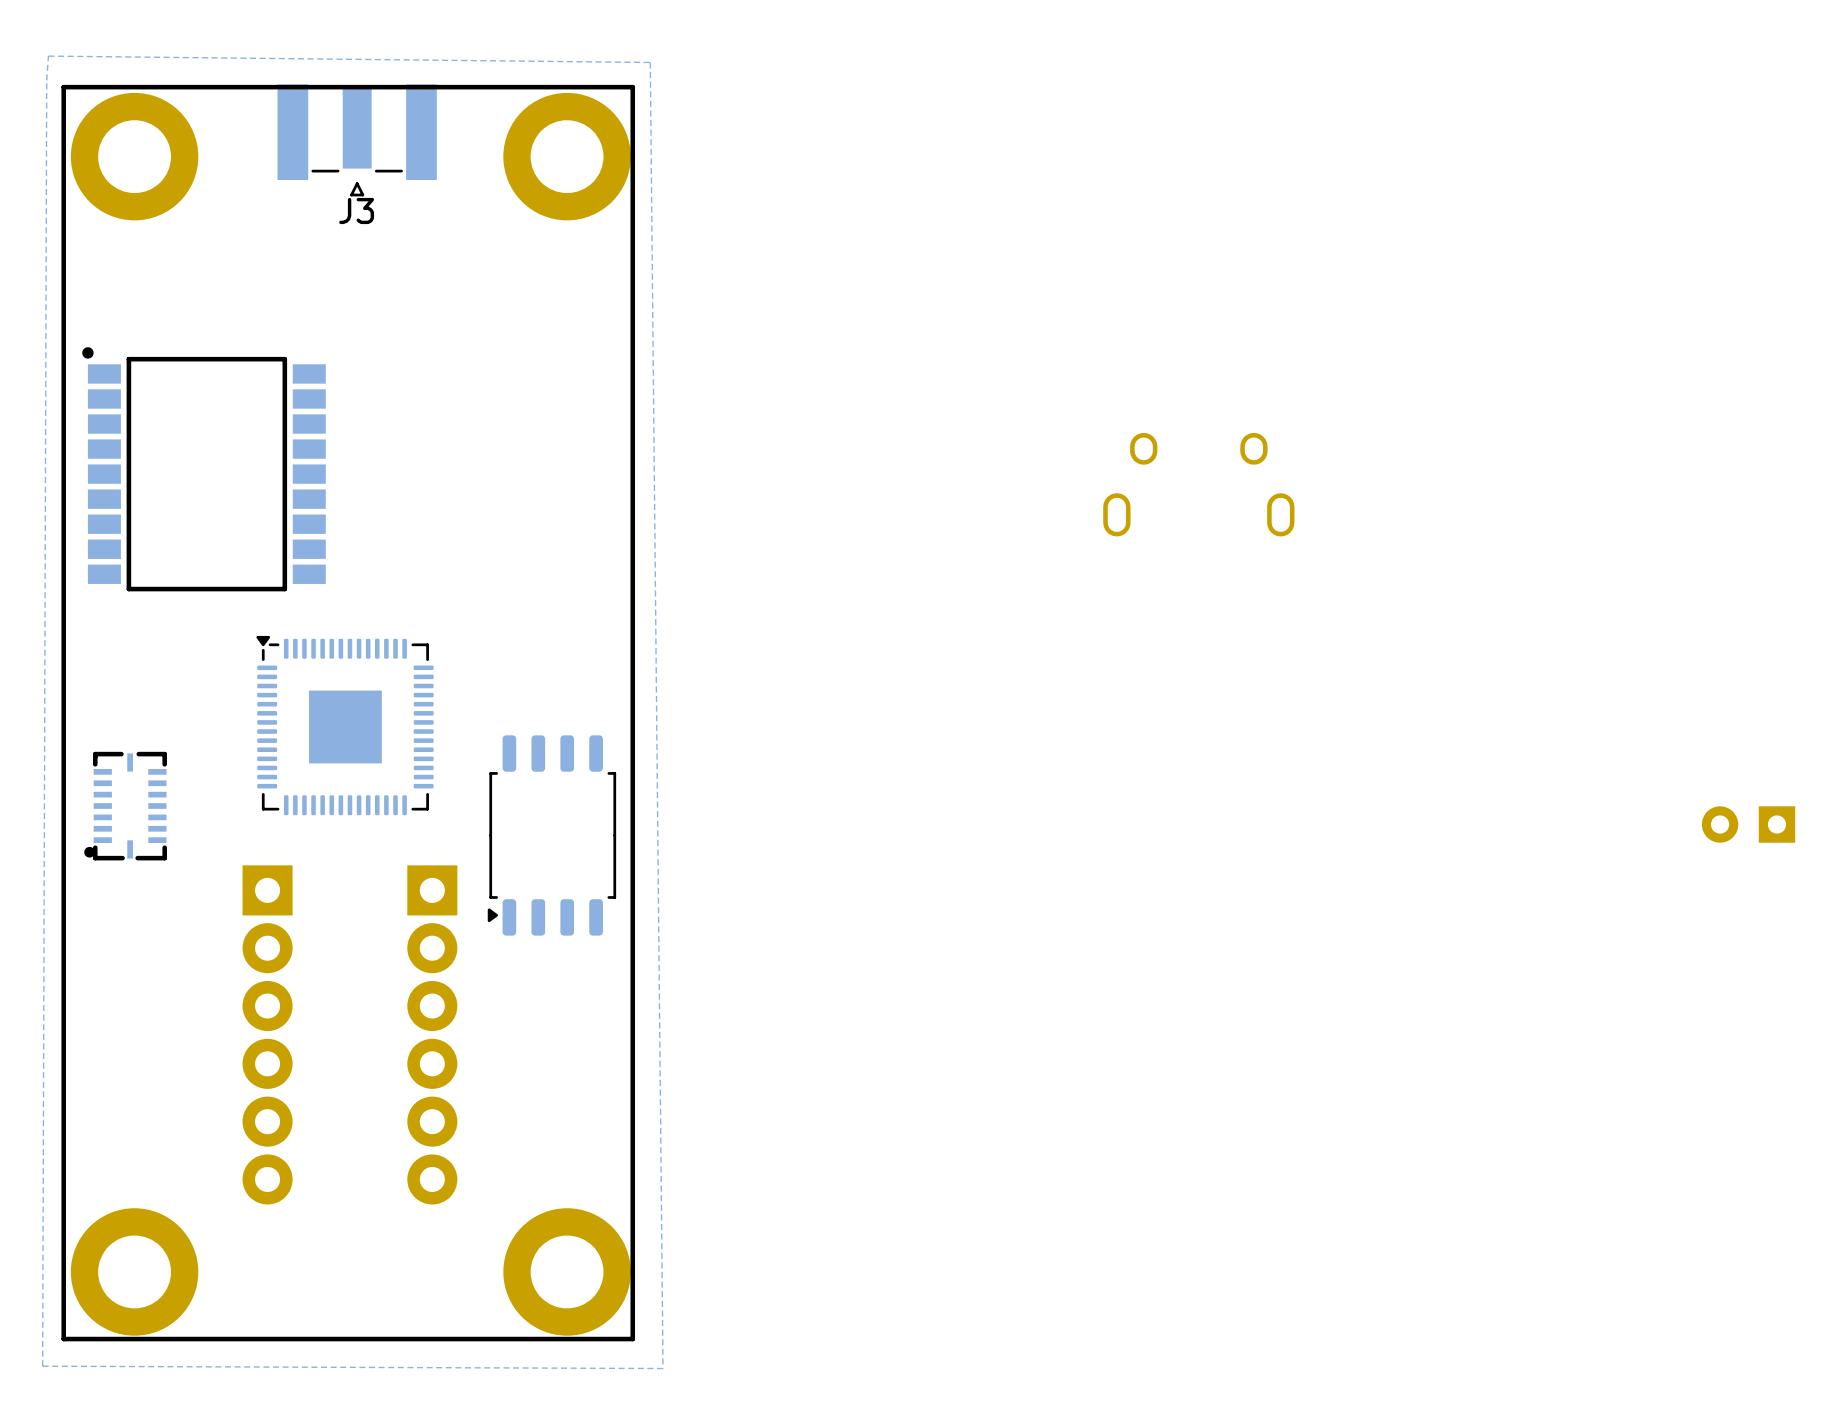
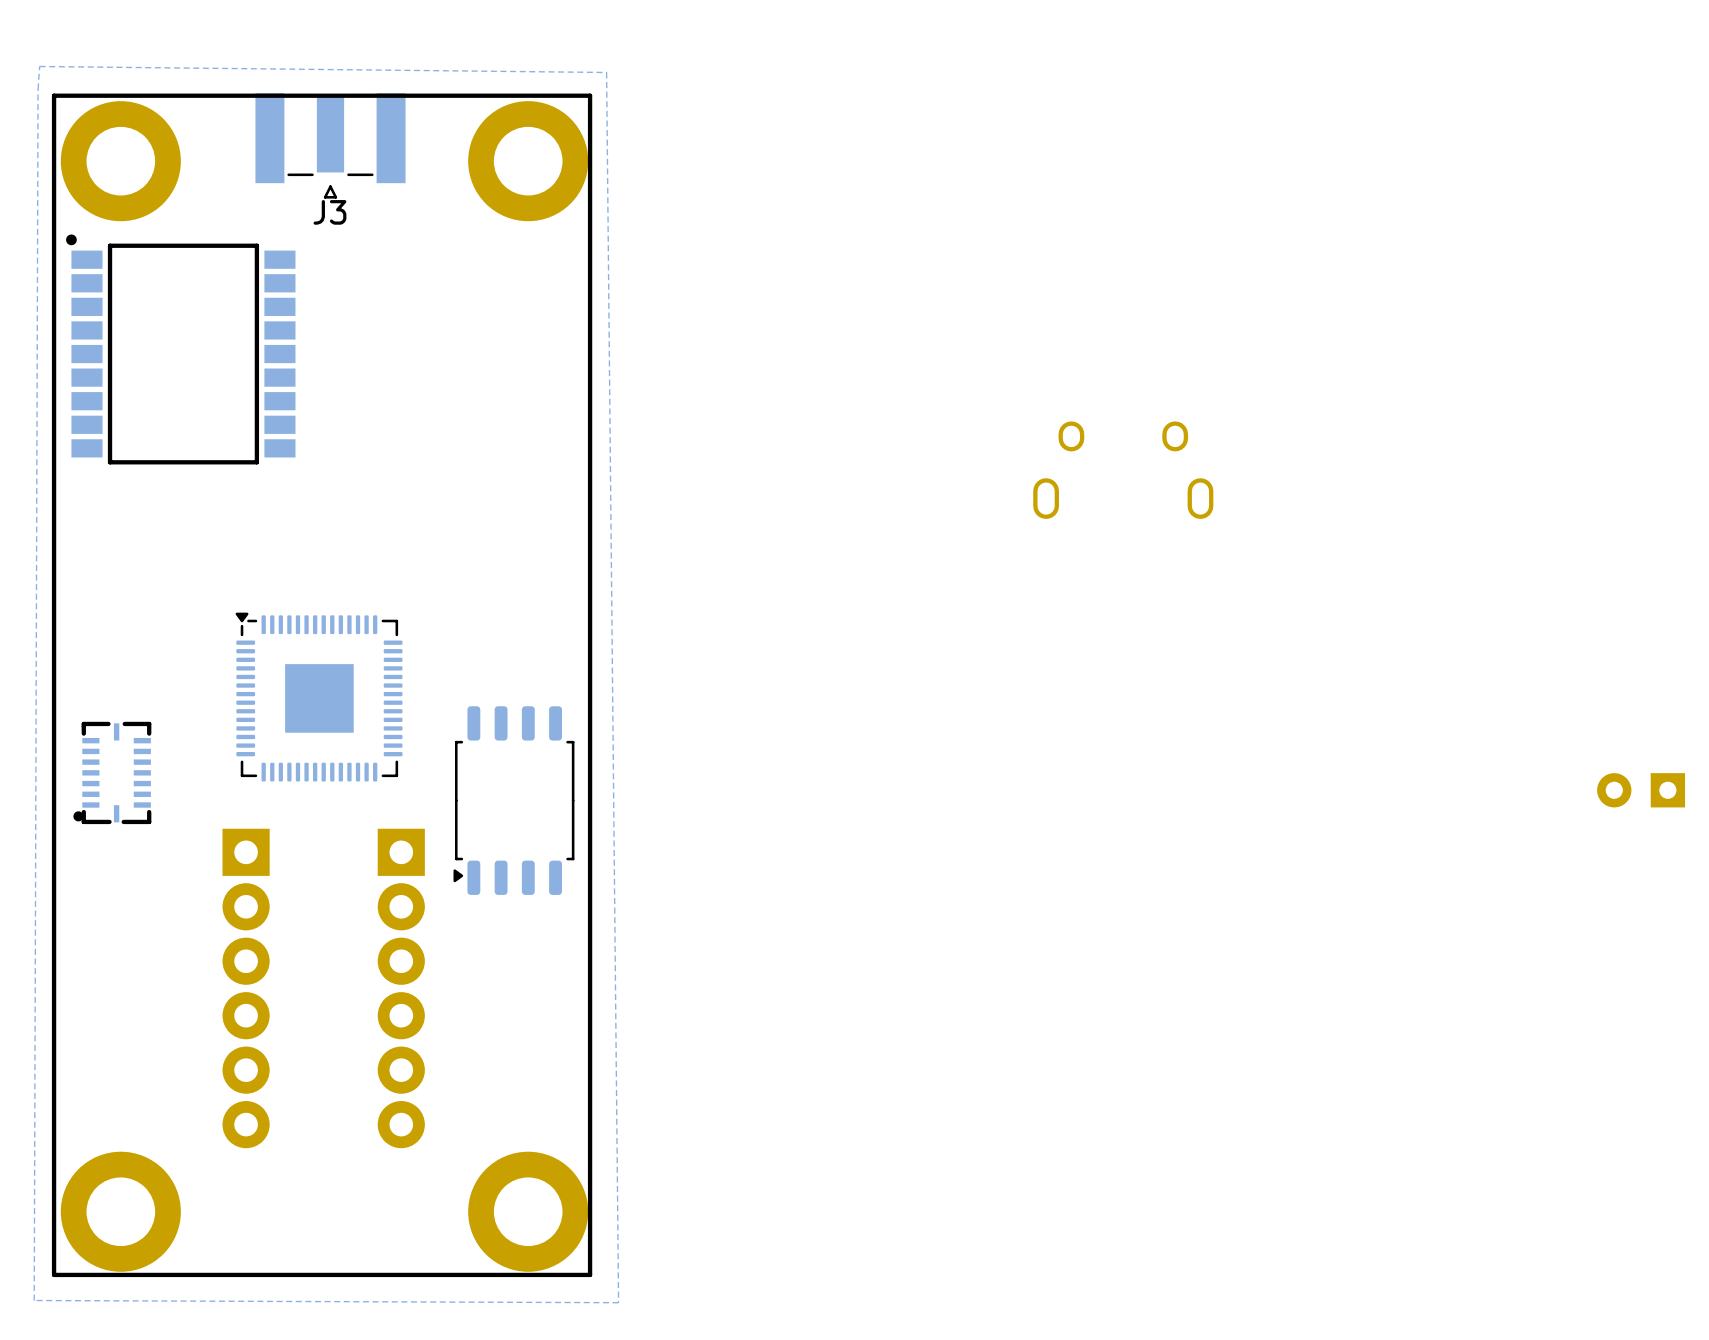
part position: (204, 469) -> (180, 349)

